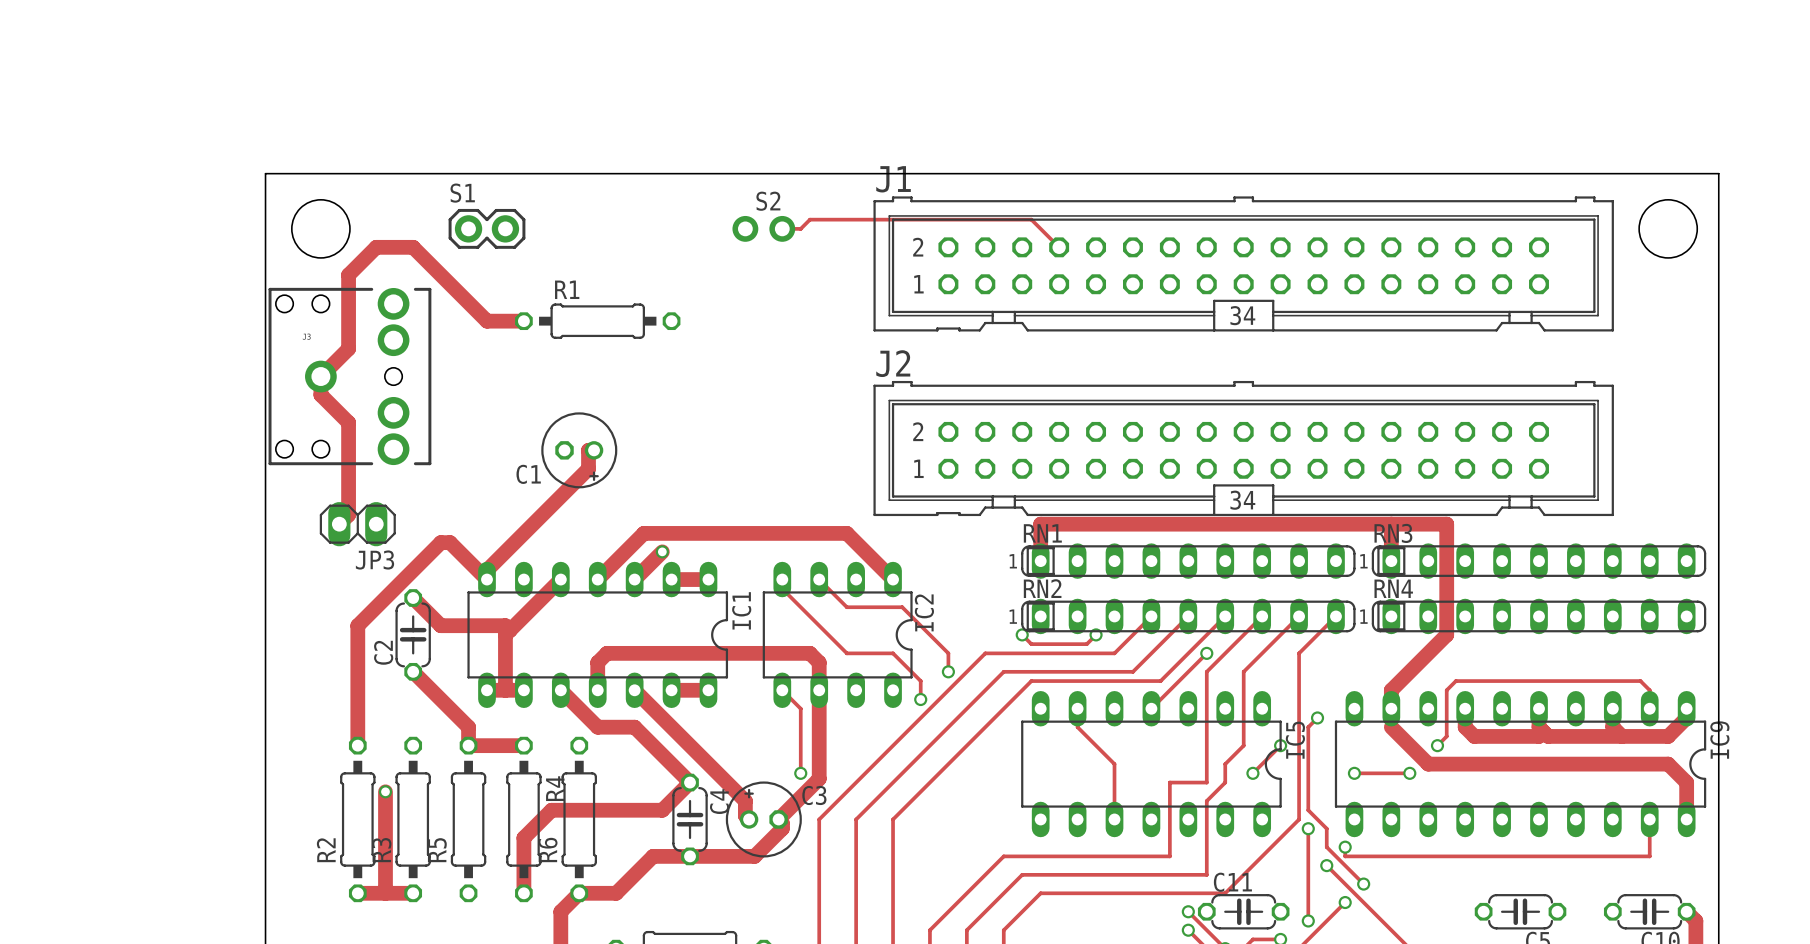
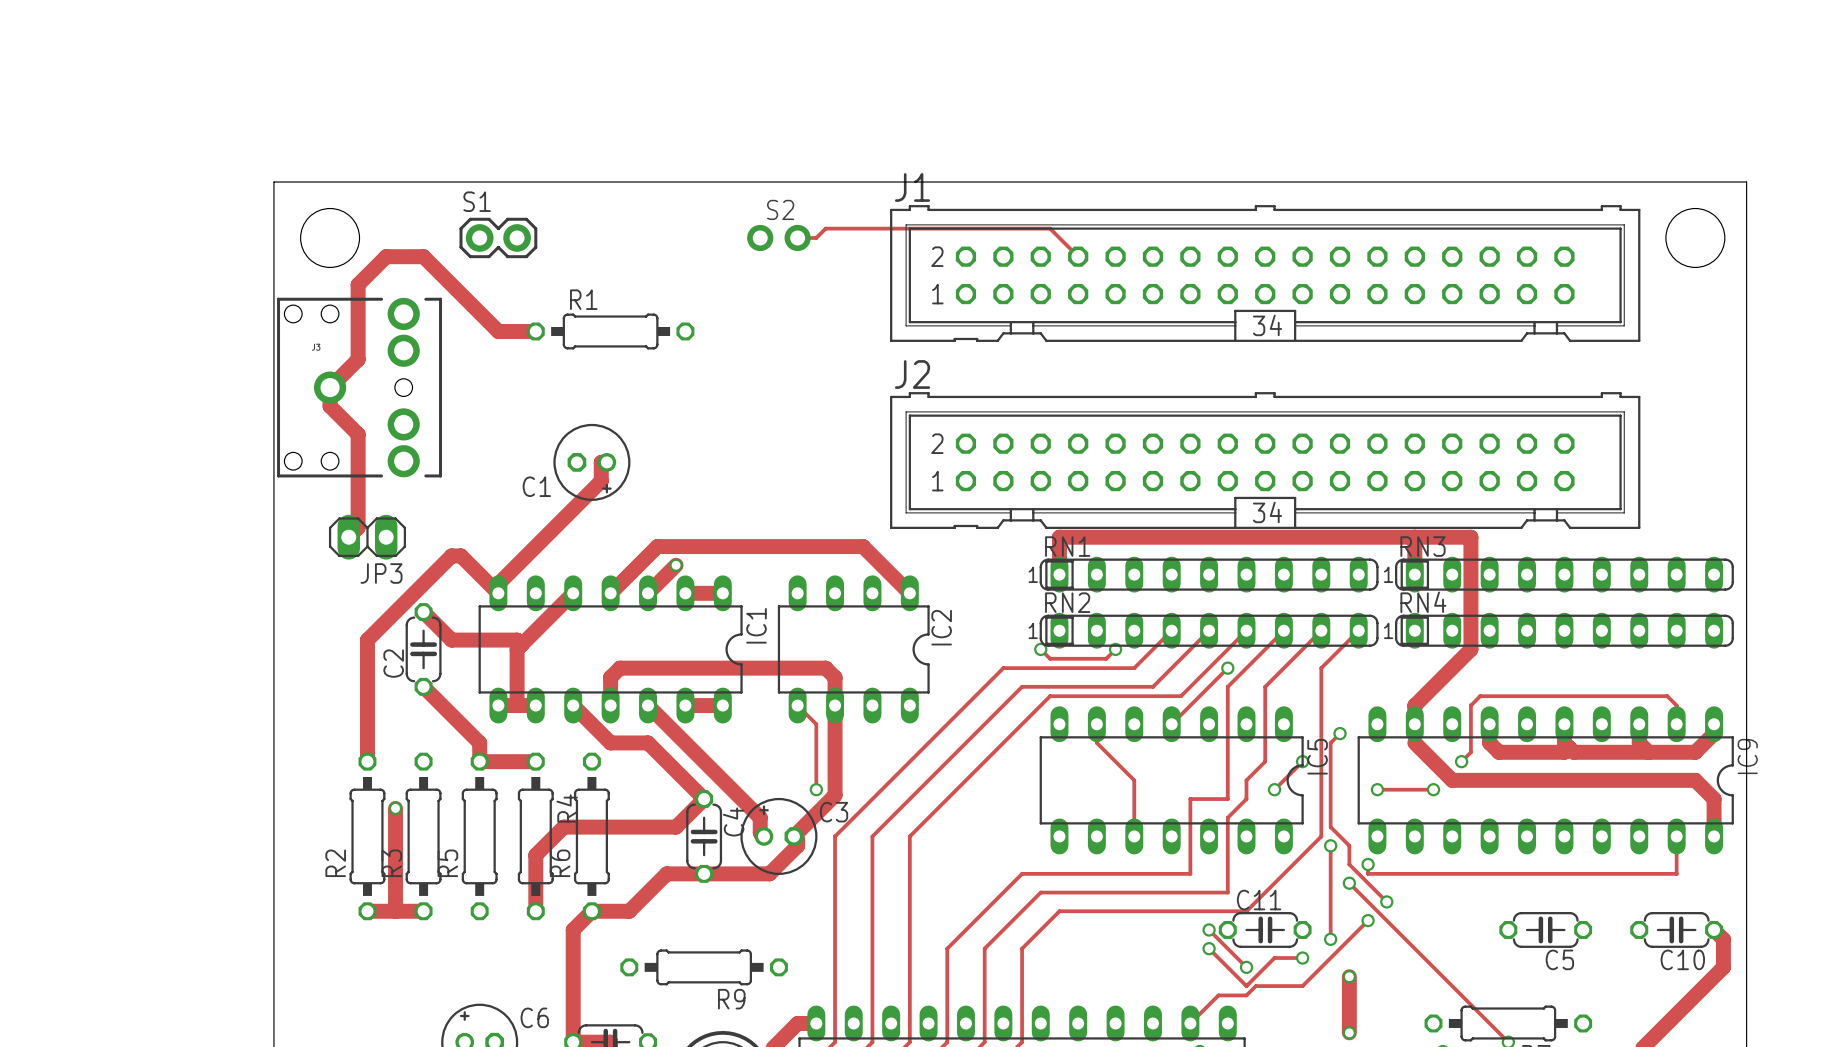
track: (782, 579) (782, 588) (846, 653) (893, 653) (920, 681) (920, 699) -> none
track: (819, 579) (846, 607) (902, 607) (948, 653) (948, 671) -> none
via: (948, 671) -> none
via: (920, 699) -> none

